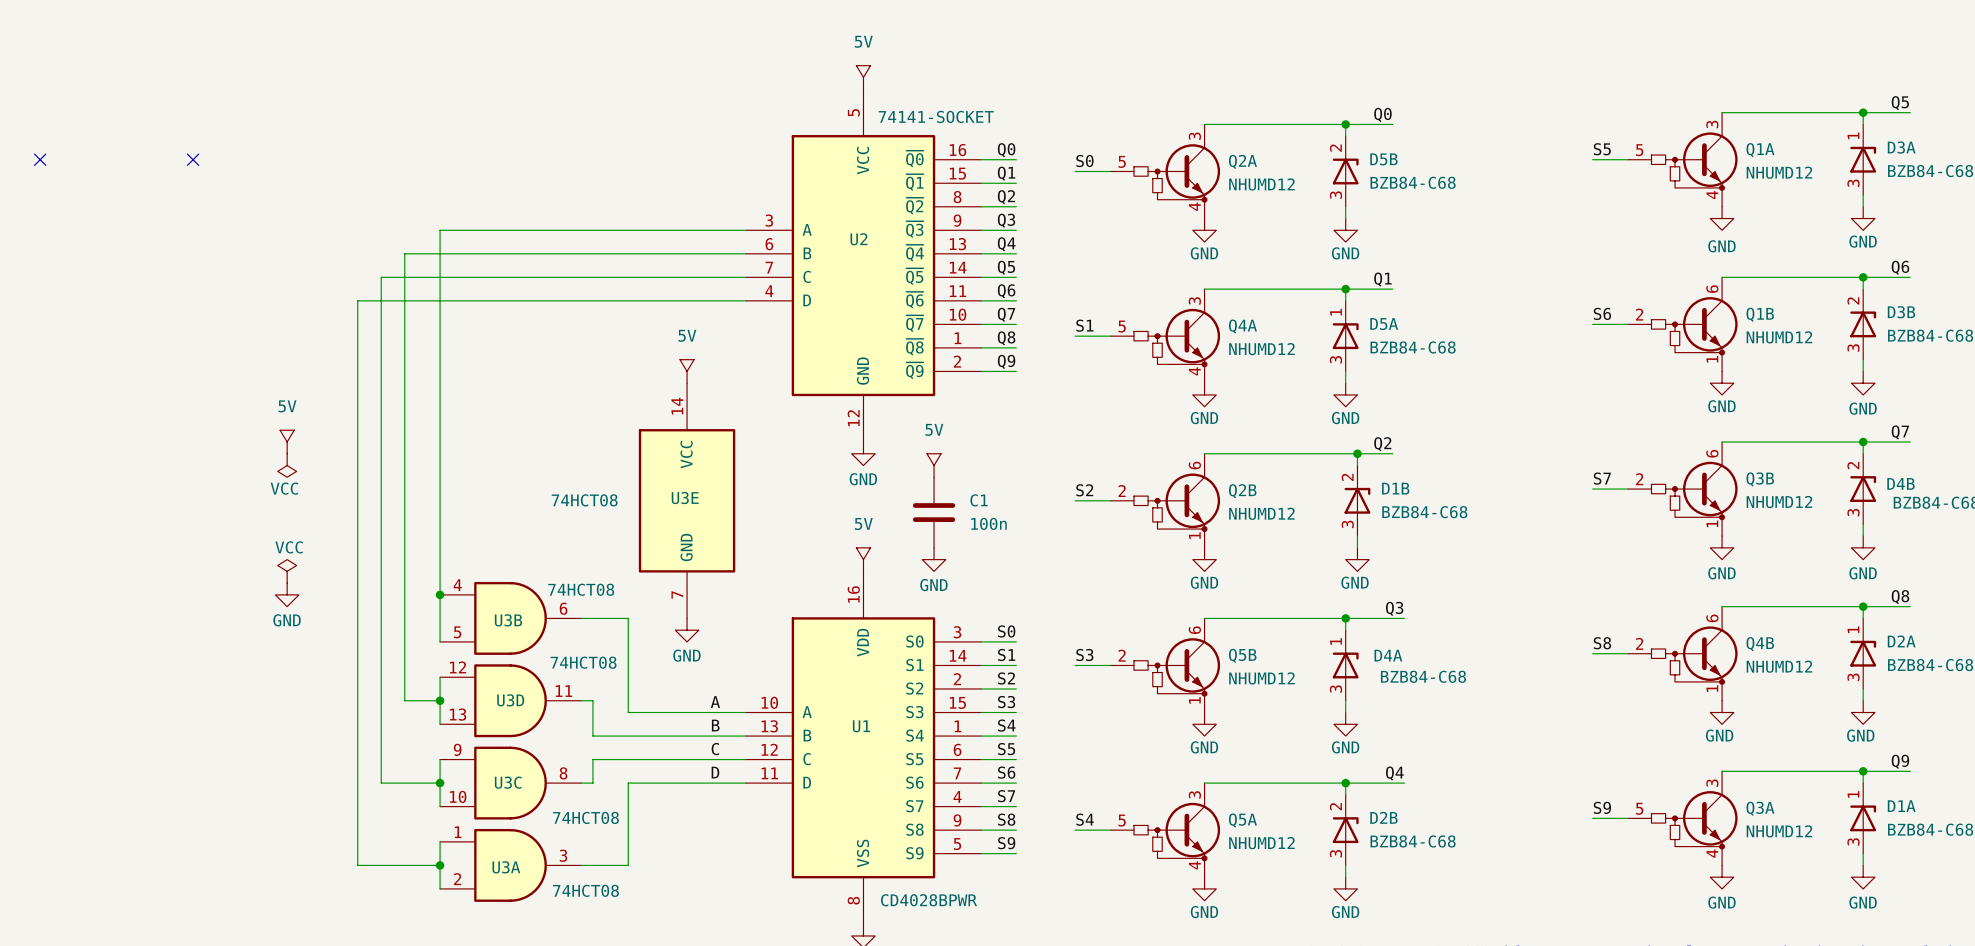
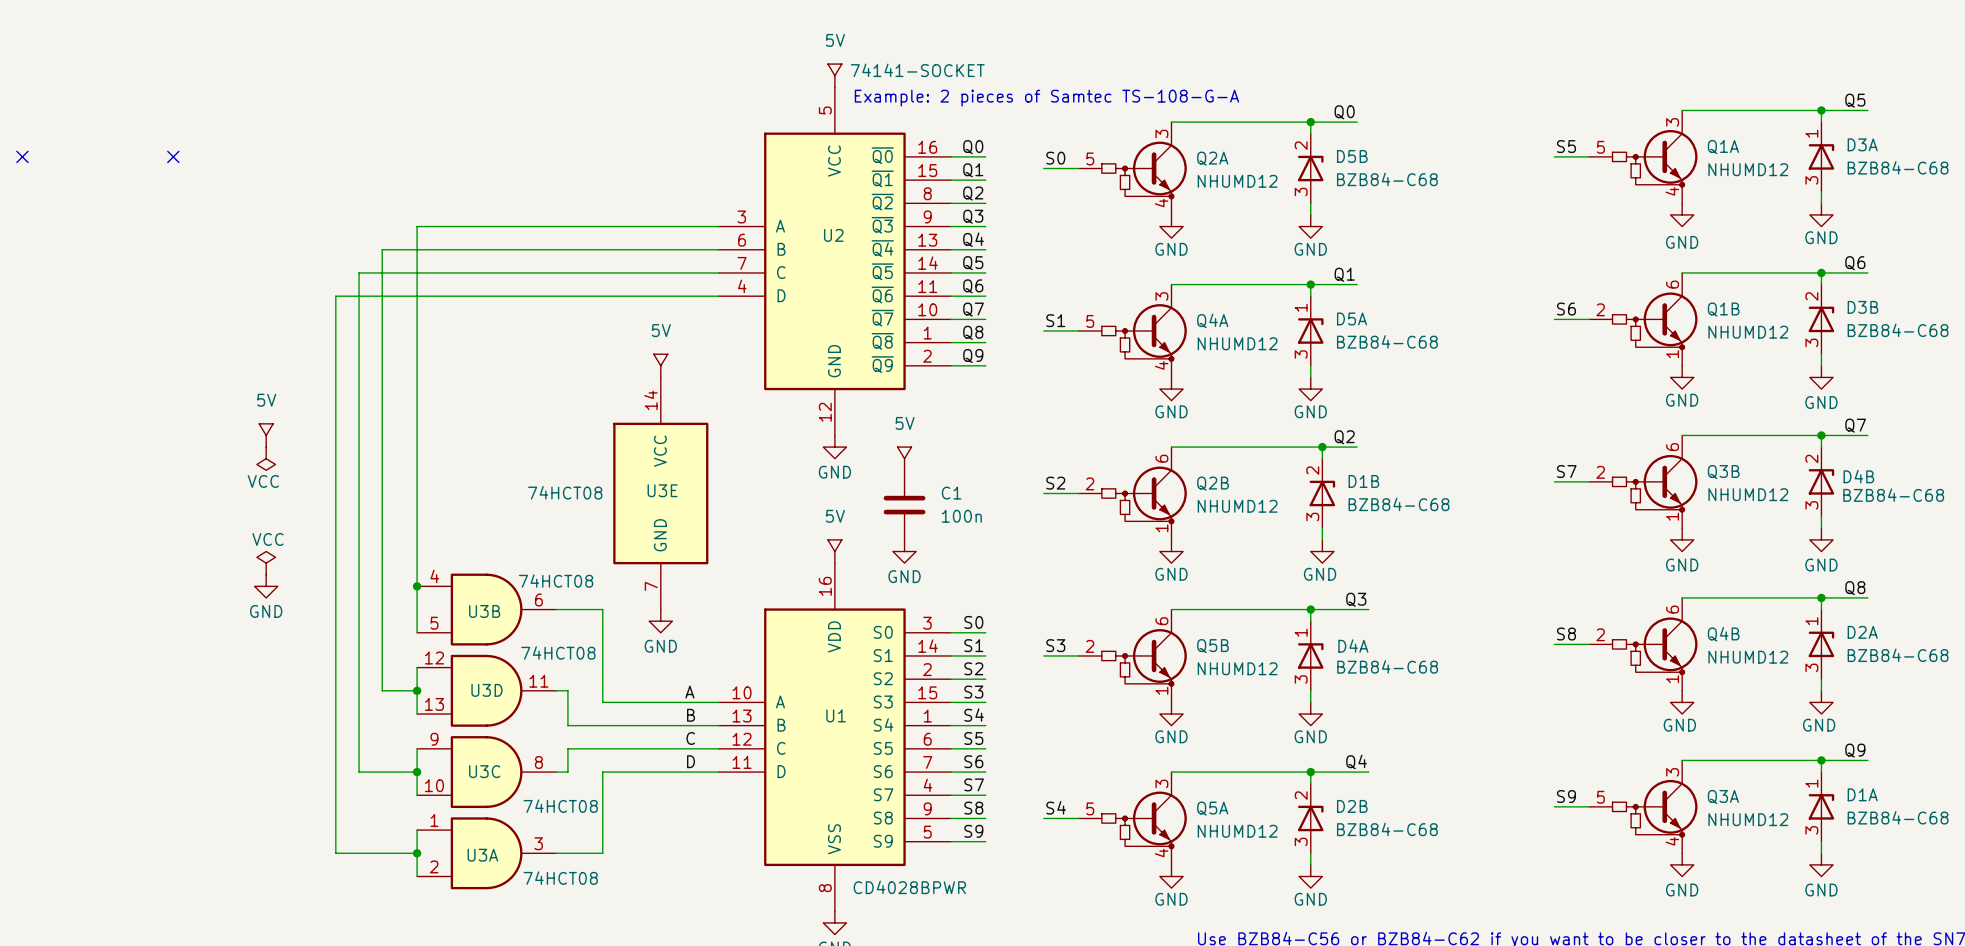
text: none -> Example: 2 pieces of Samtec TS-108-G-A (1046, 98)
U2 value position: 74141-SOCKET (936, 116) -> 74141-SOCKET (917, 70)

